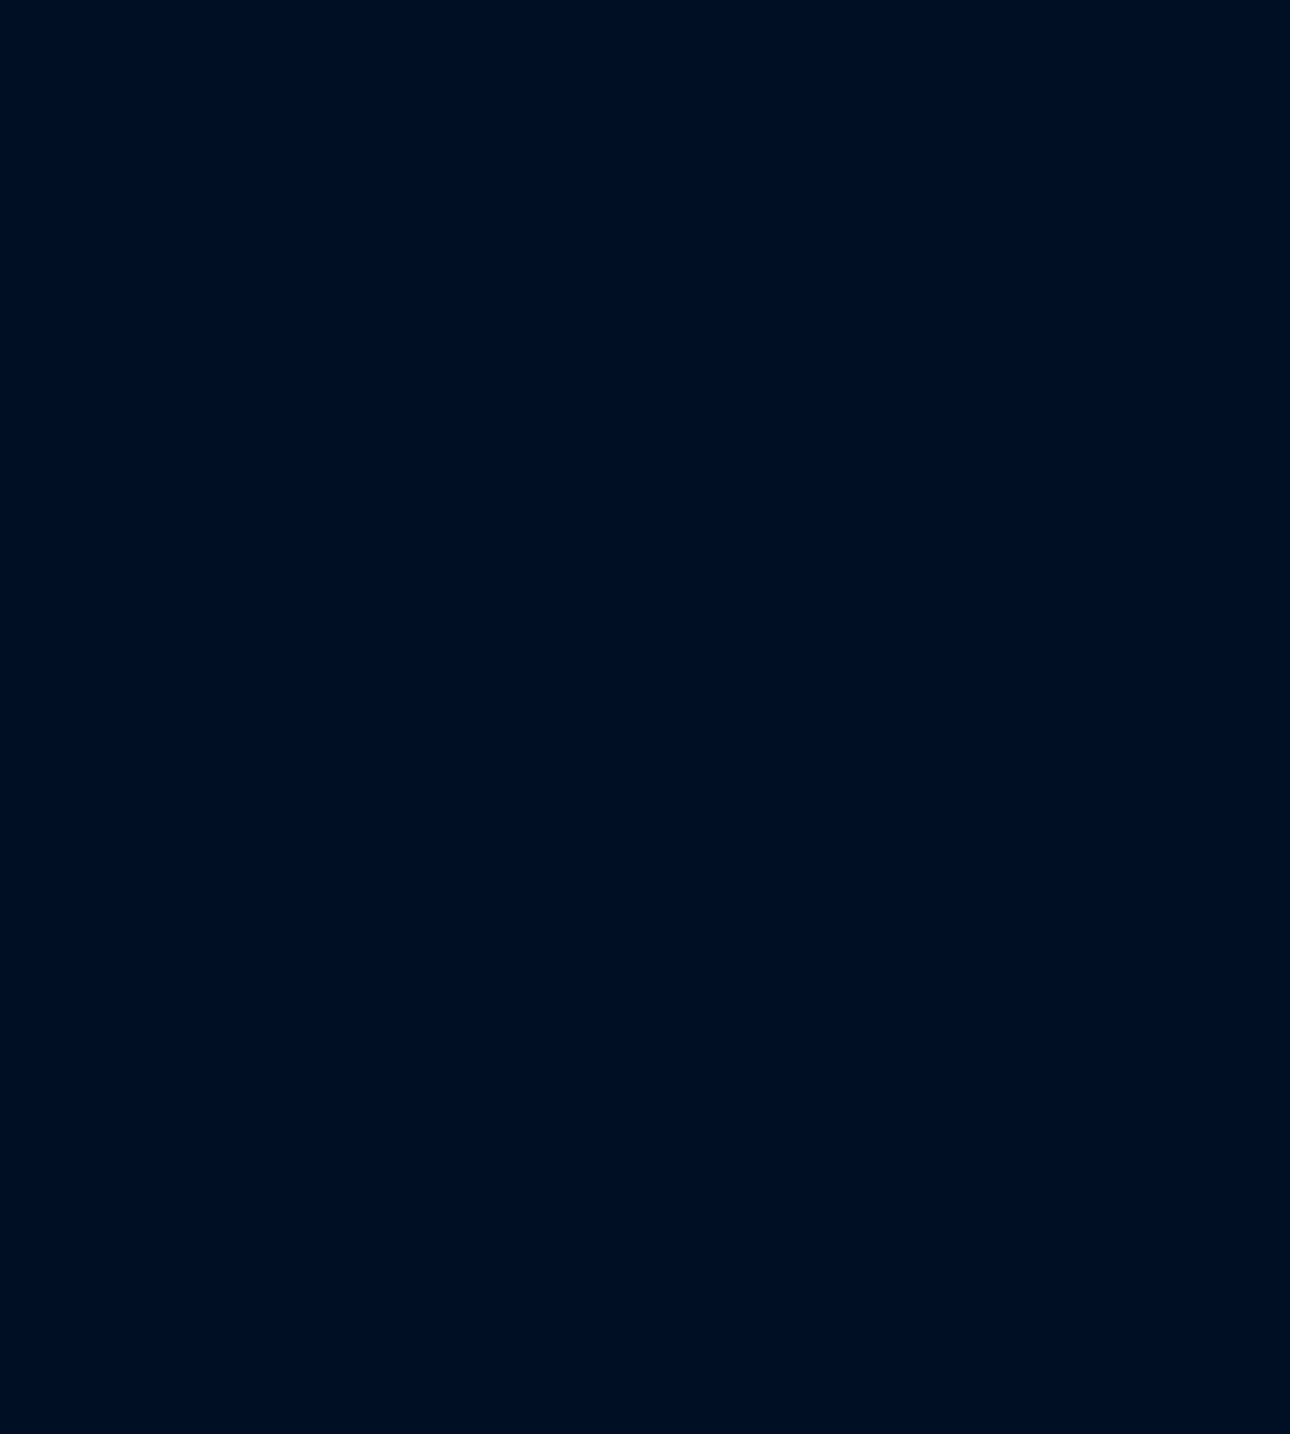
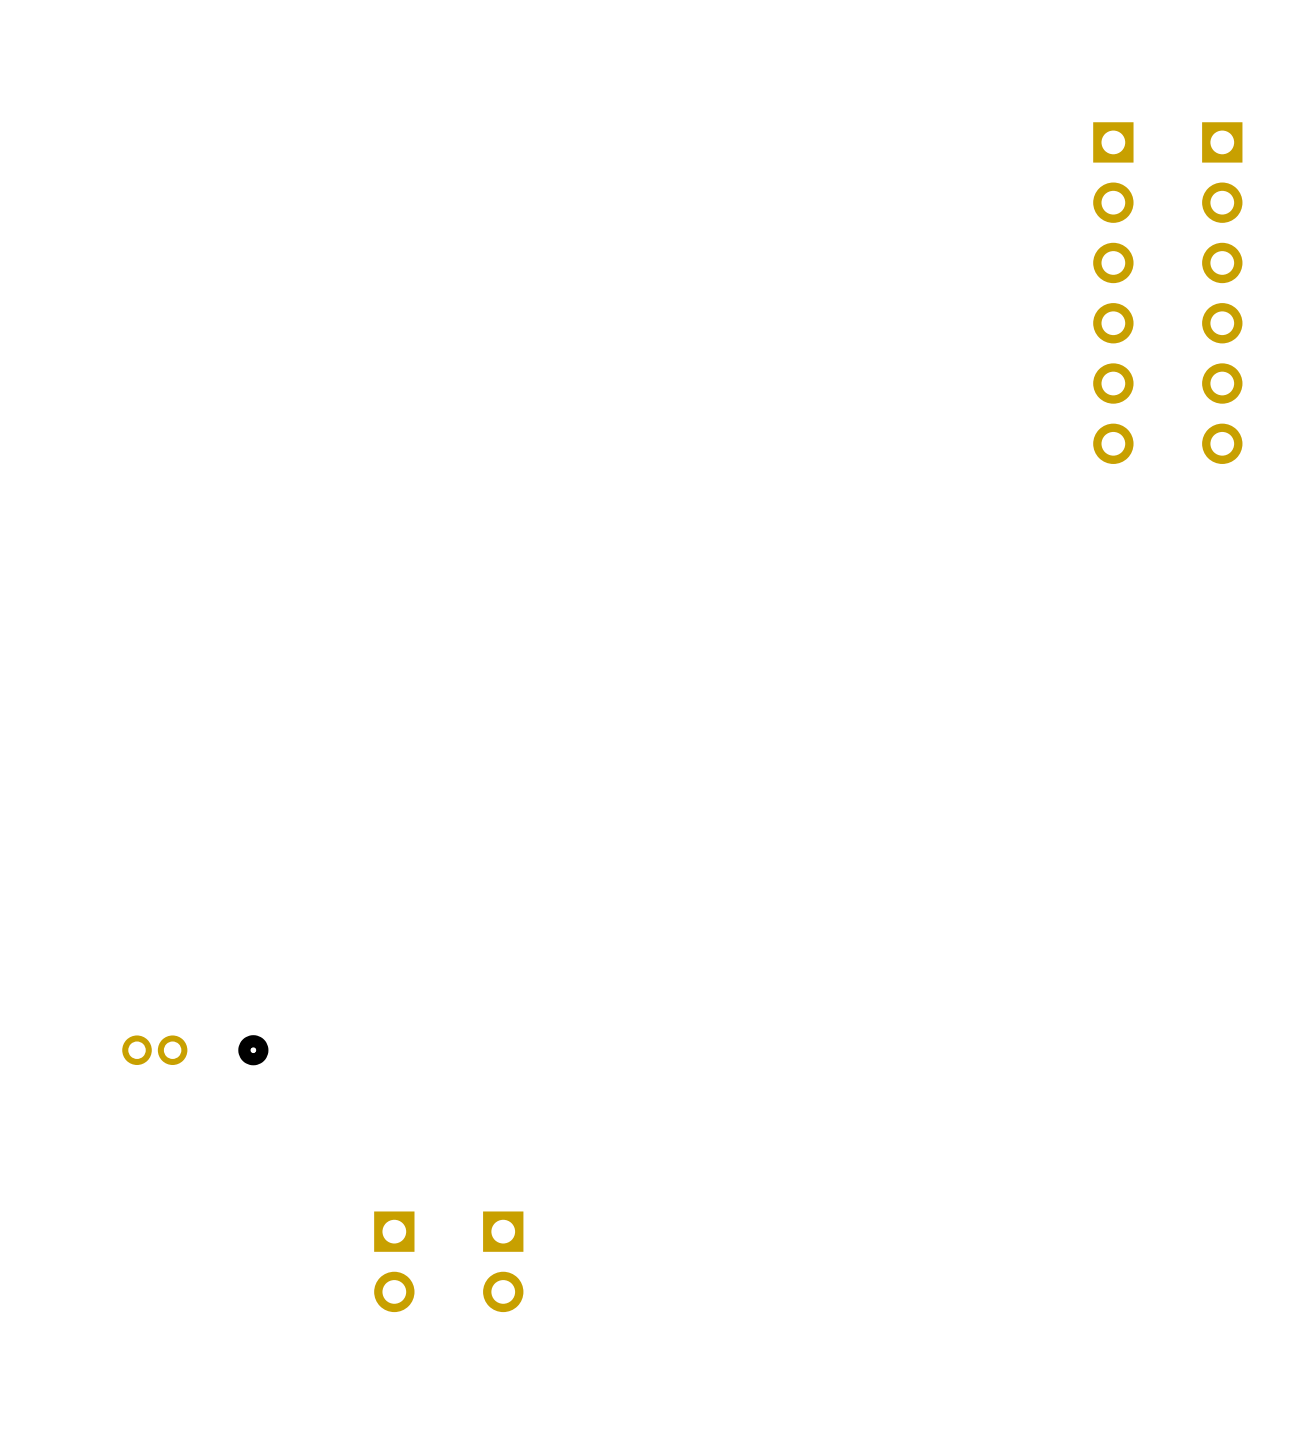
part: none -> (1113, 293)
part: none -> (1222, 293)
part: none -> (195, 1050)
part: none -> (394, 1261)
part: none -> (503, 1261)

